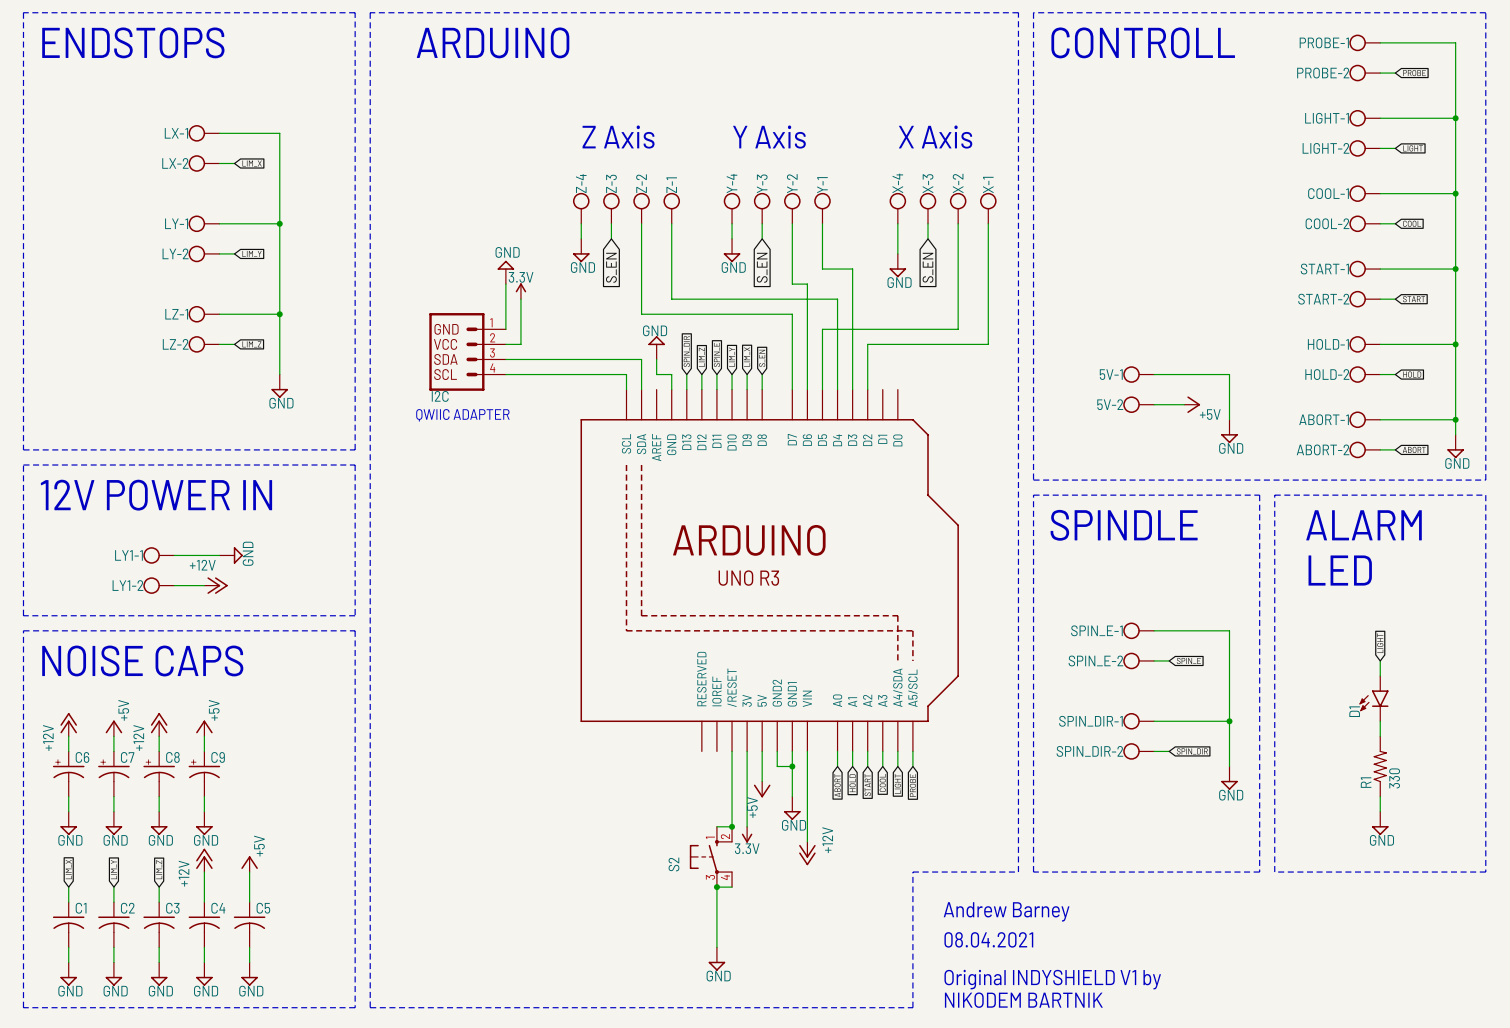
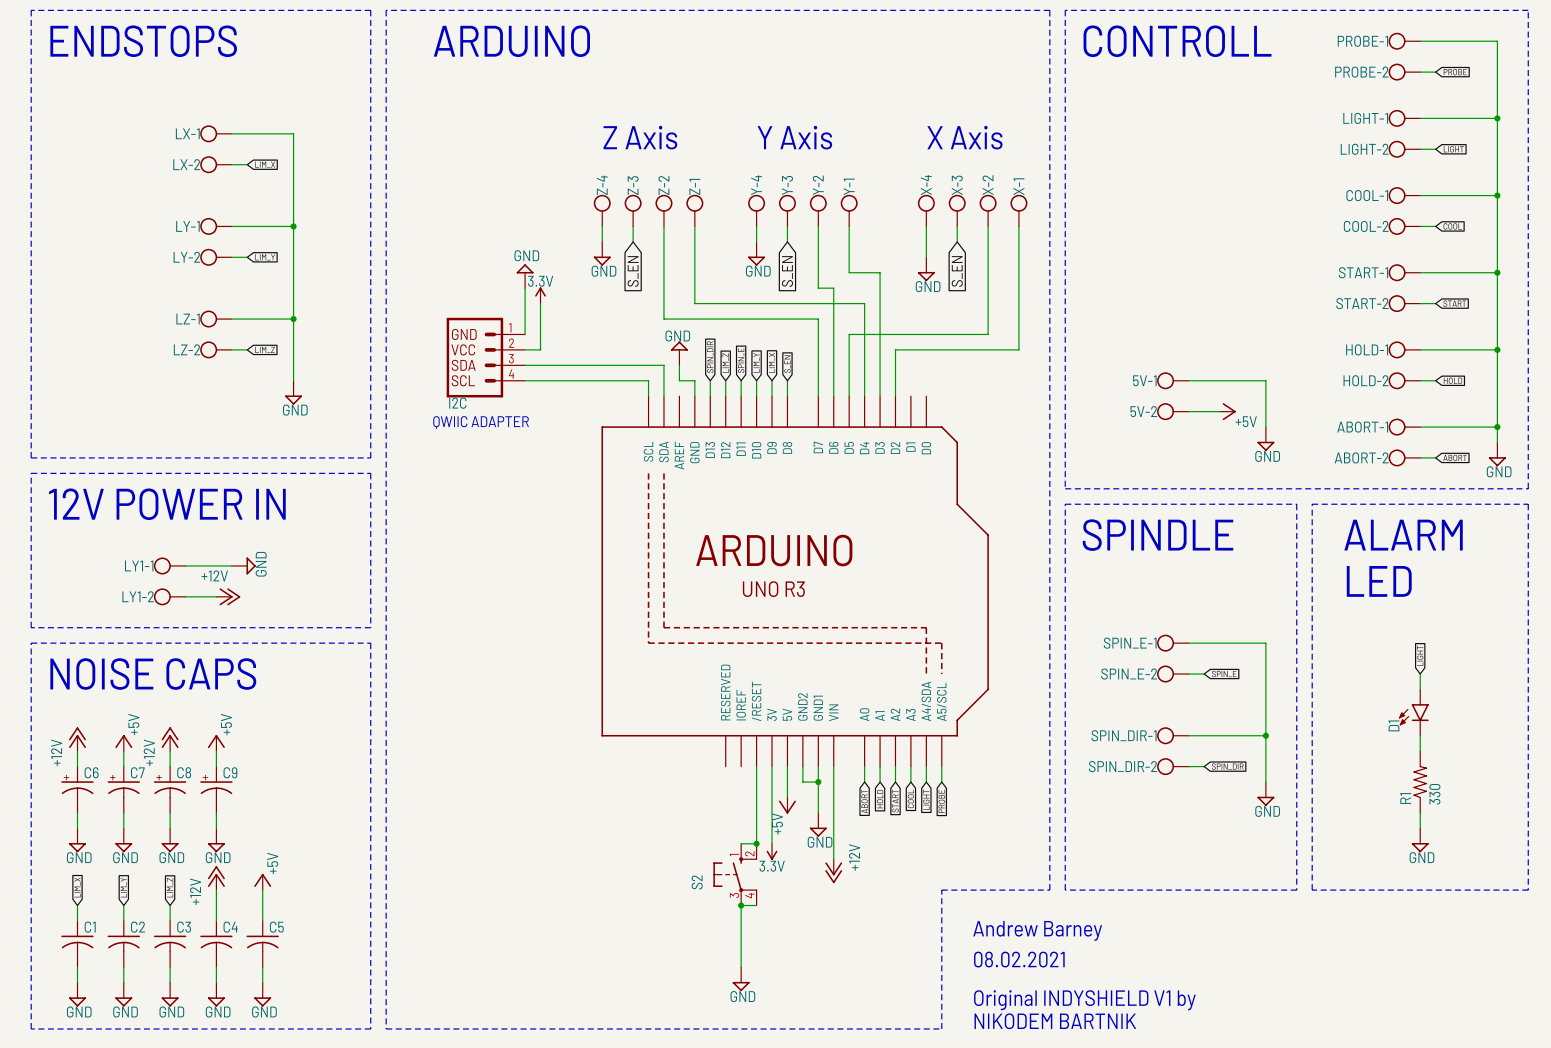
text: 08.04.2021 (988, 939) -> 08.02.2021 (1019, 959)

